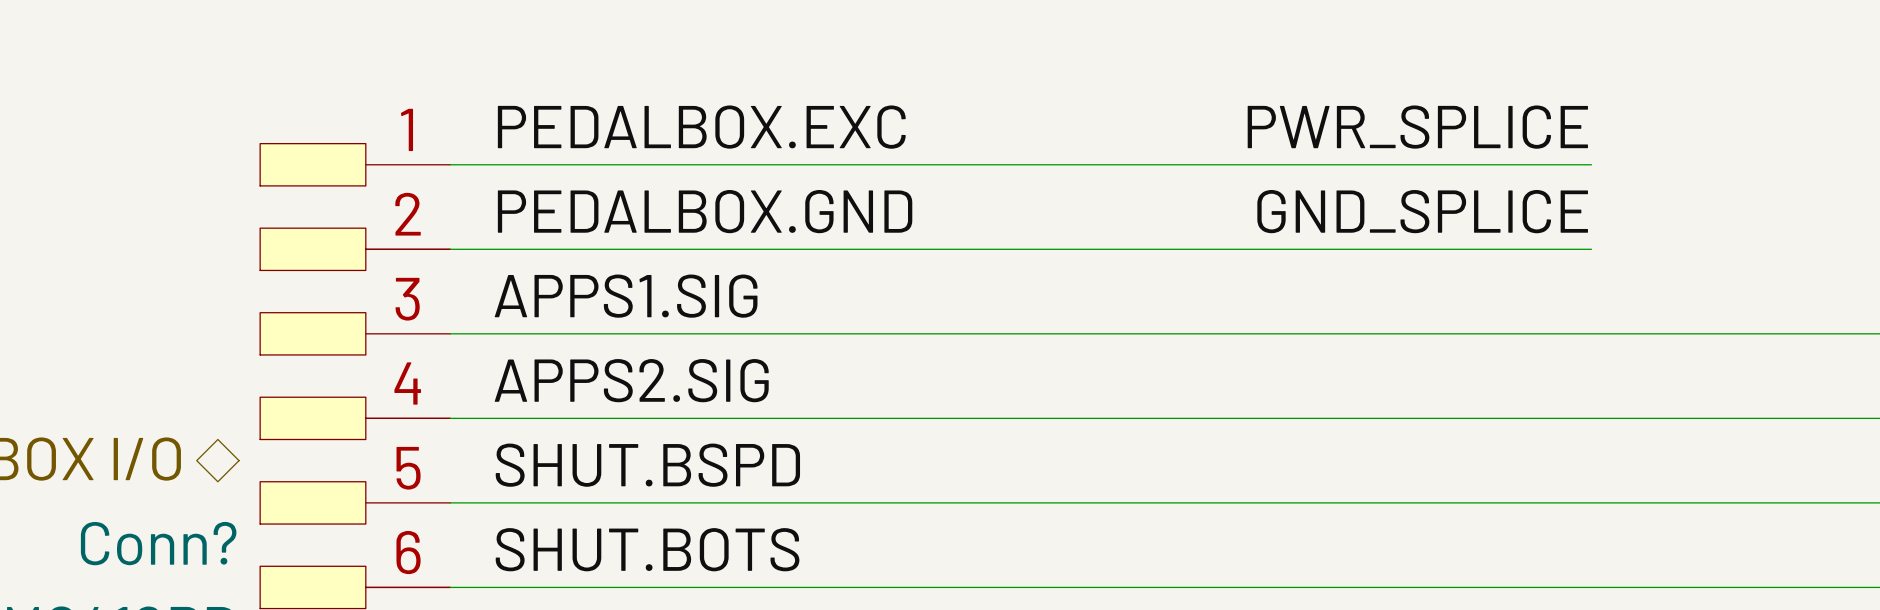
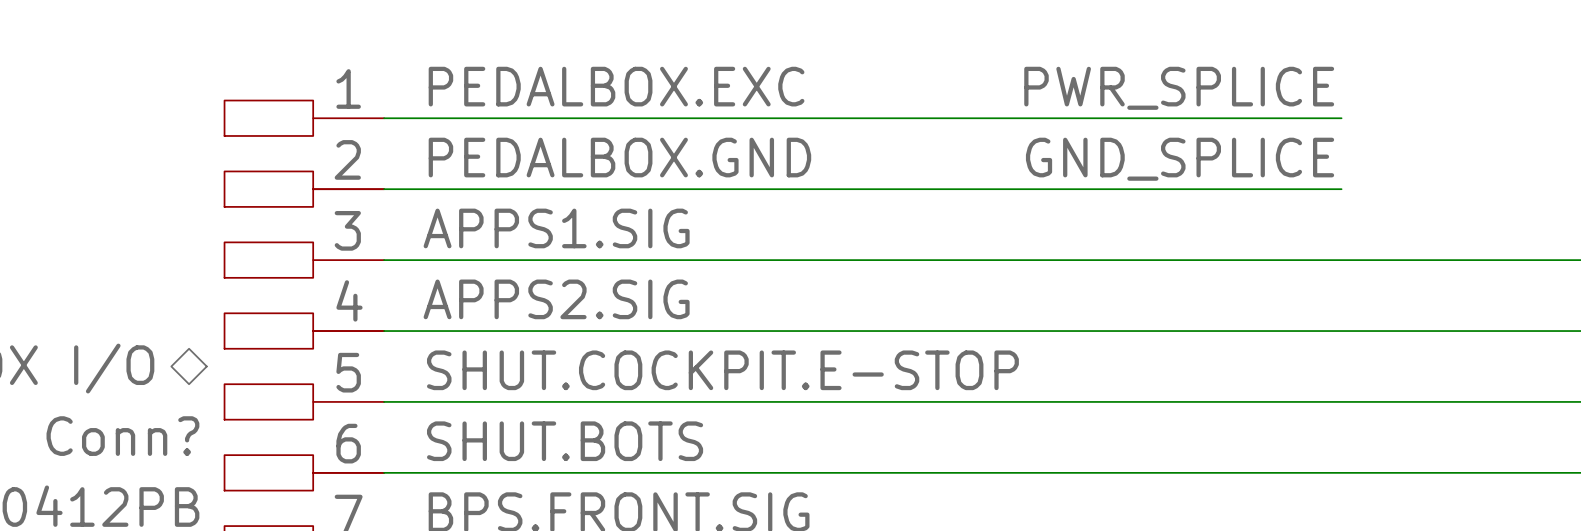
label: SHUT.BSPD (647, 465) -> SHUT.COCKPIT.E-STOP (722, 370)

